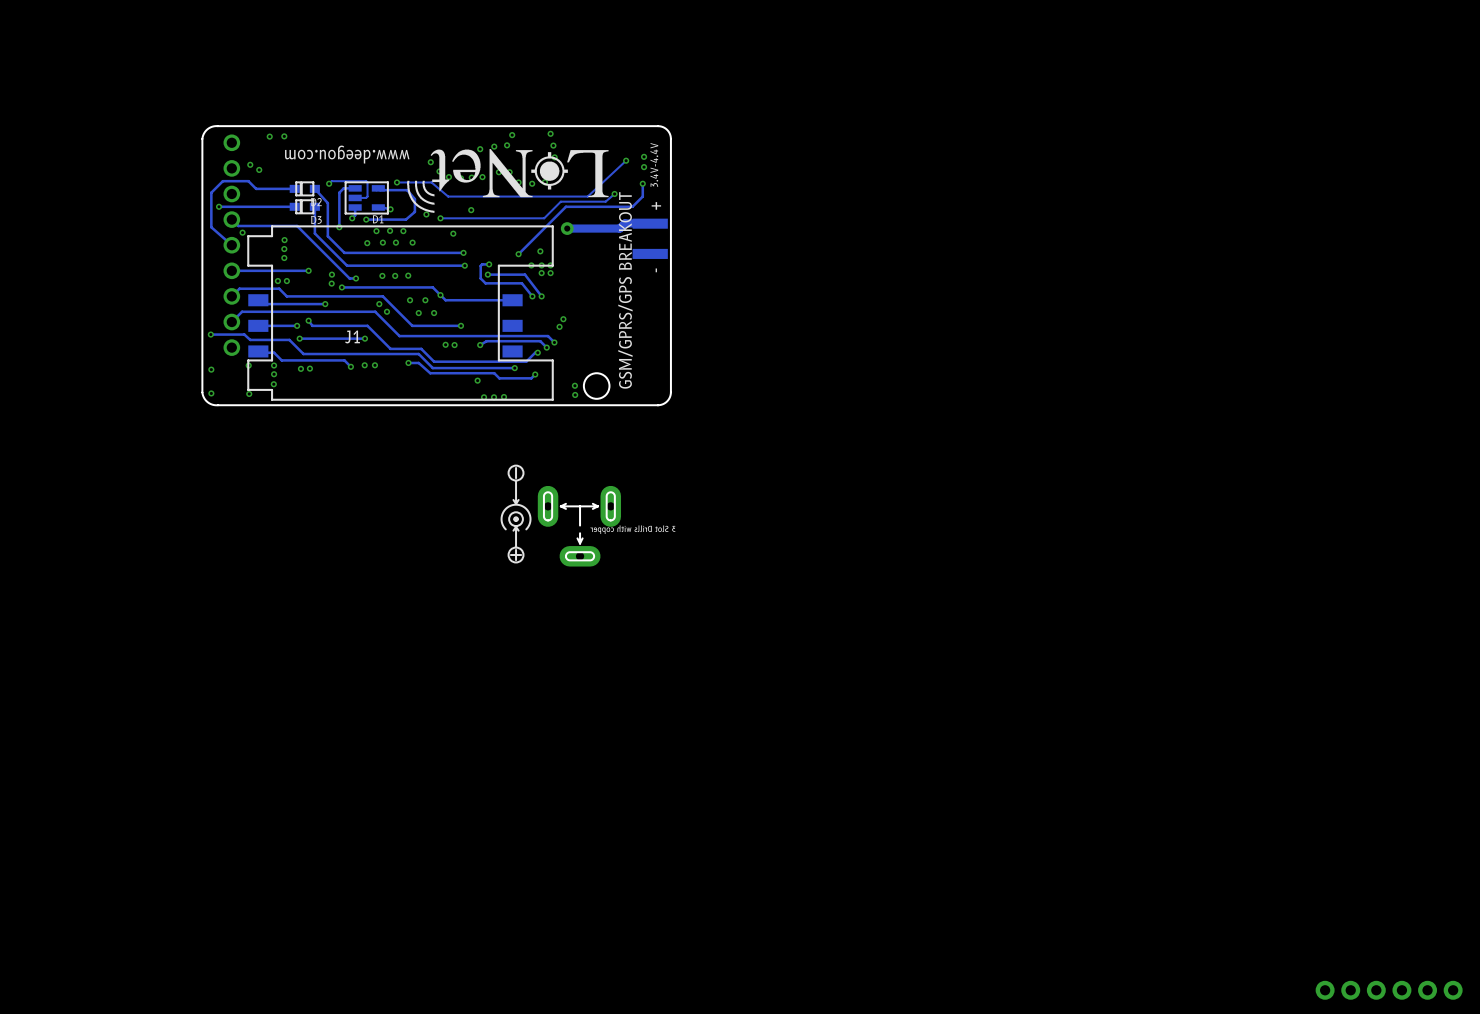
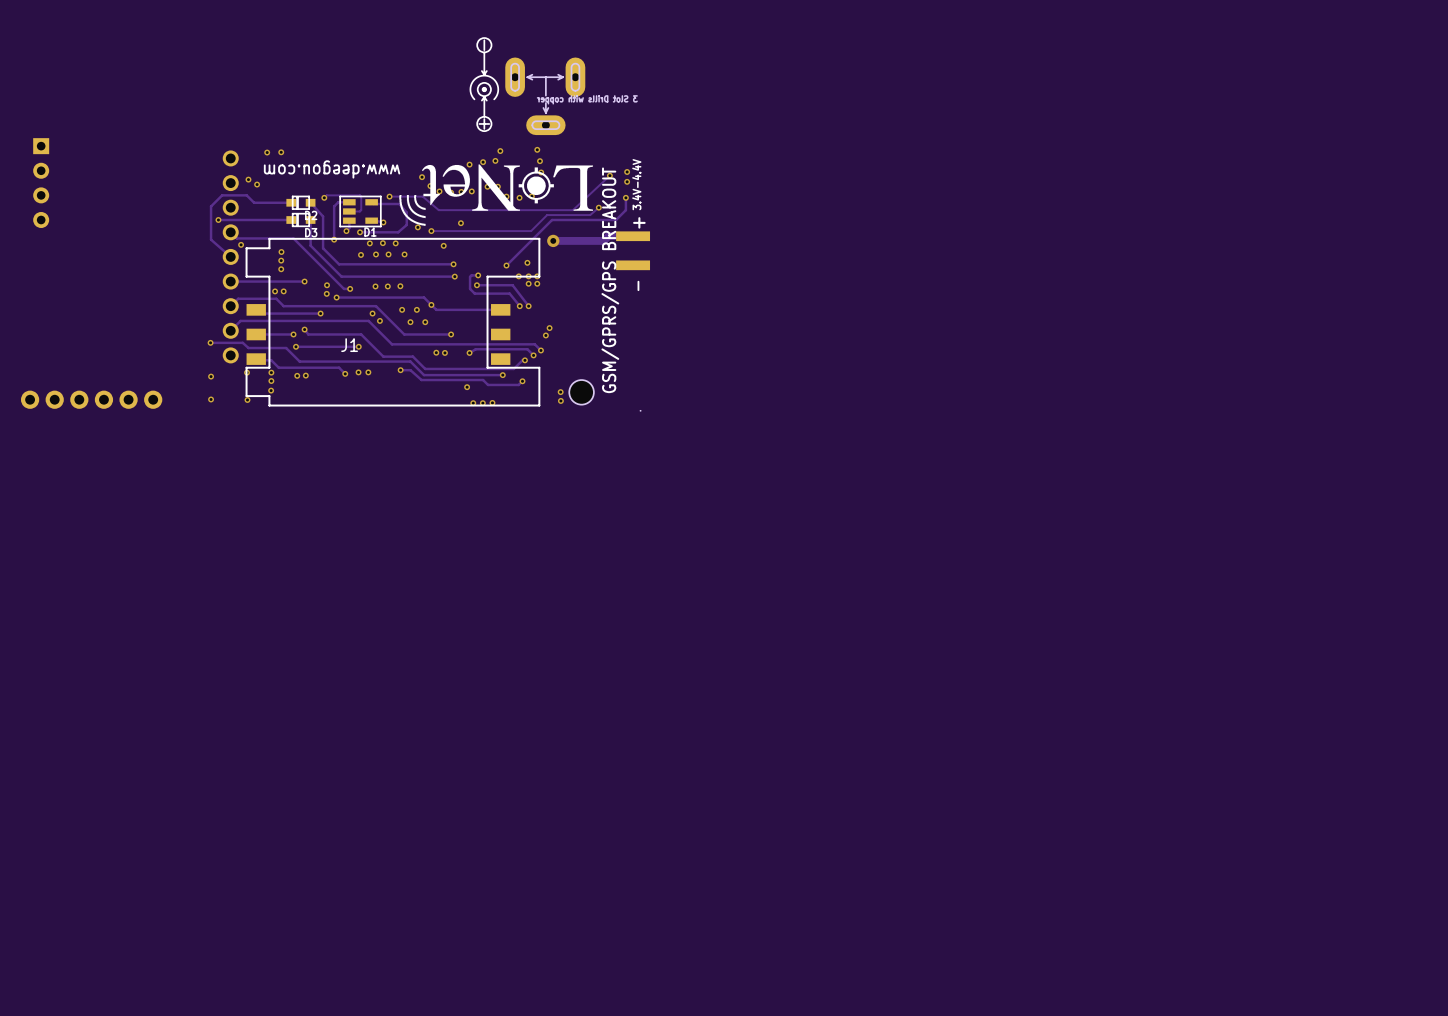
part: none -> (527, 86)
board edge: (658, 126) (215, 126) (208, 128) (202, 138) (202, 392) (204, 397) (209, 403) (216, 405) (657, 405) (664, 403) (669, 398) (670, 392) (670, 138) (667, 129) (658, 126) -> none
part: none -> (41, 183)
part: none -> (91, 399)
part: (560, 515) -> none
part: (1389, 990) -> none

